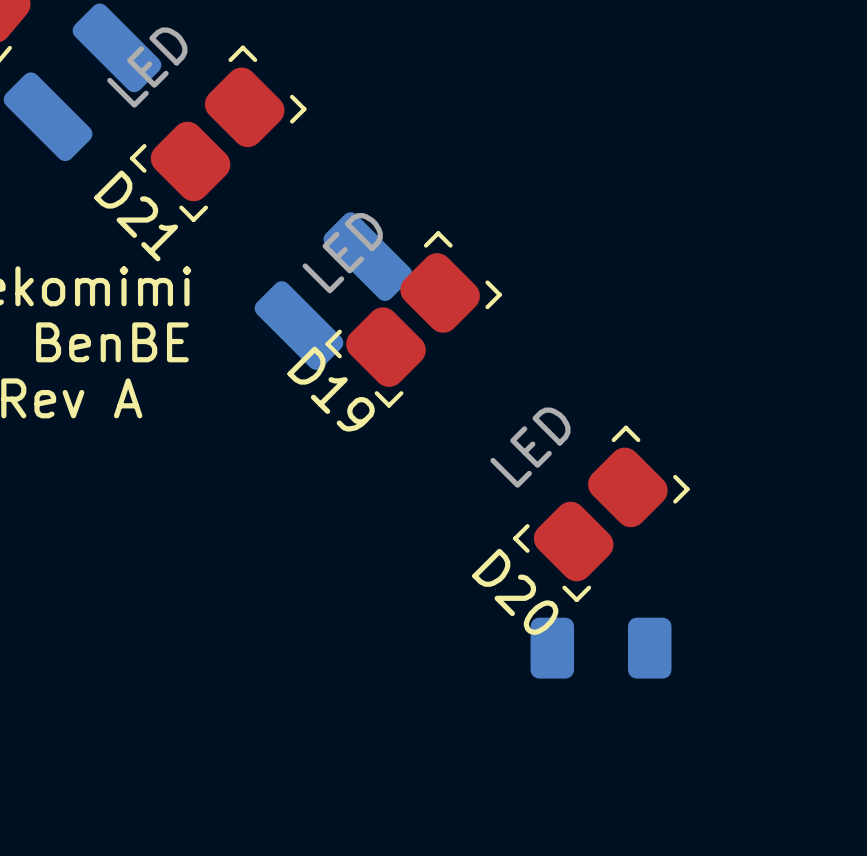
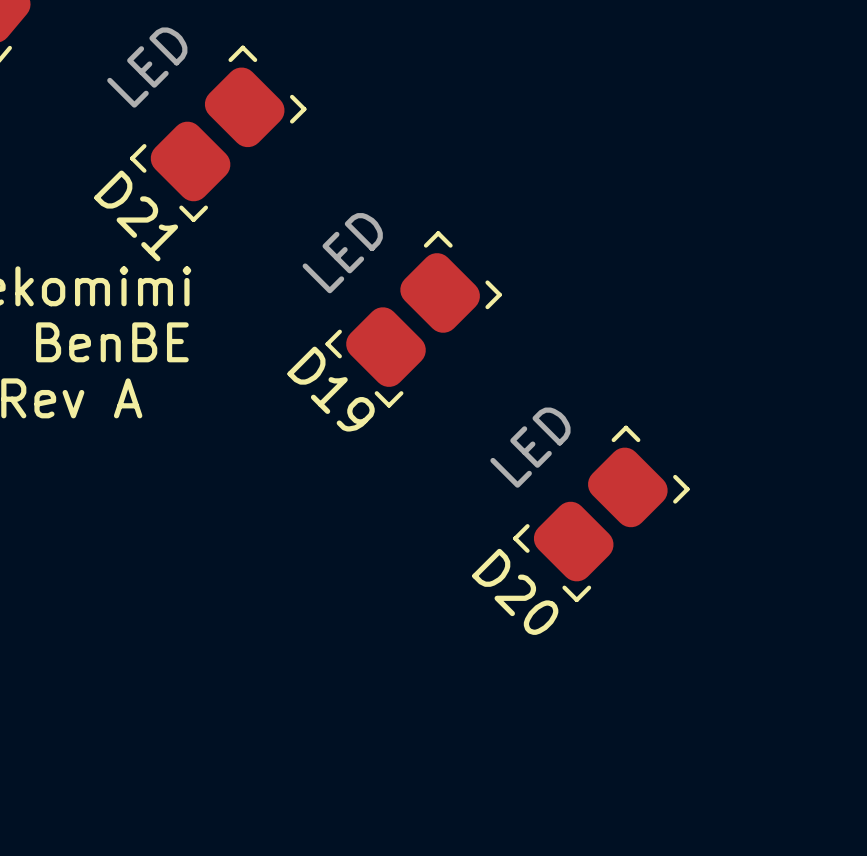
part: (82, 82) -> none
part: (333, 291) -> none
part: (601, 648) -> none

